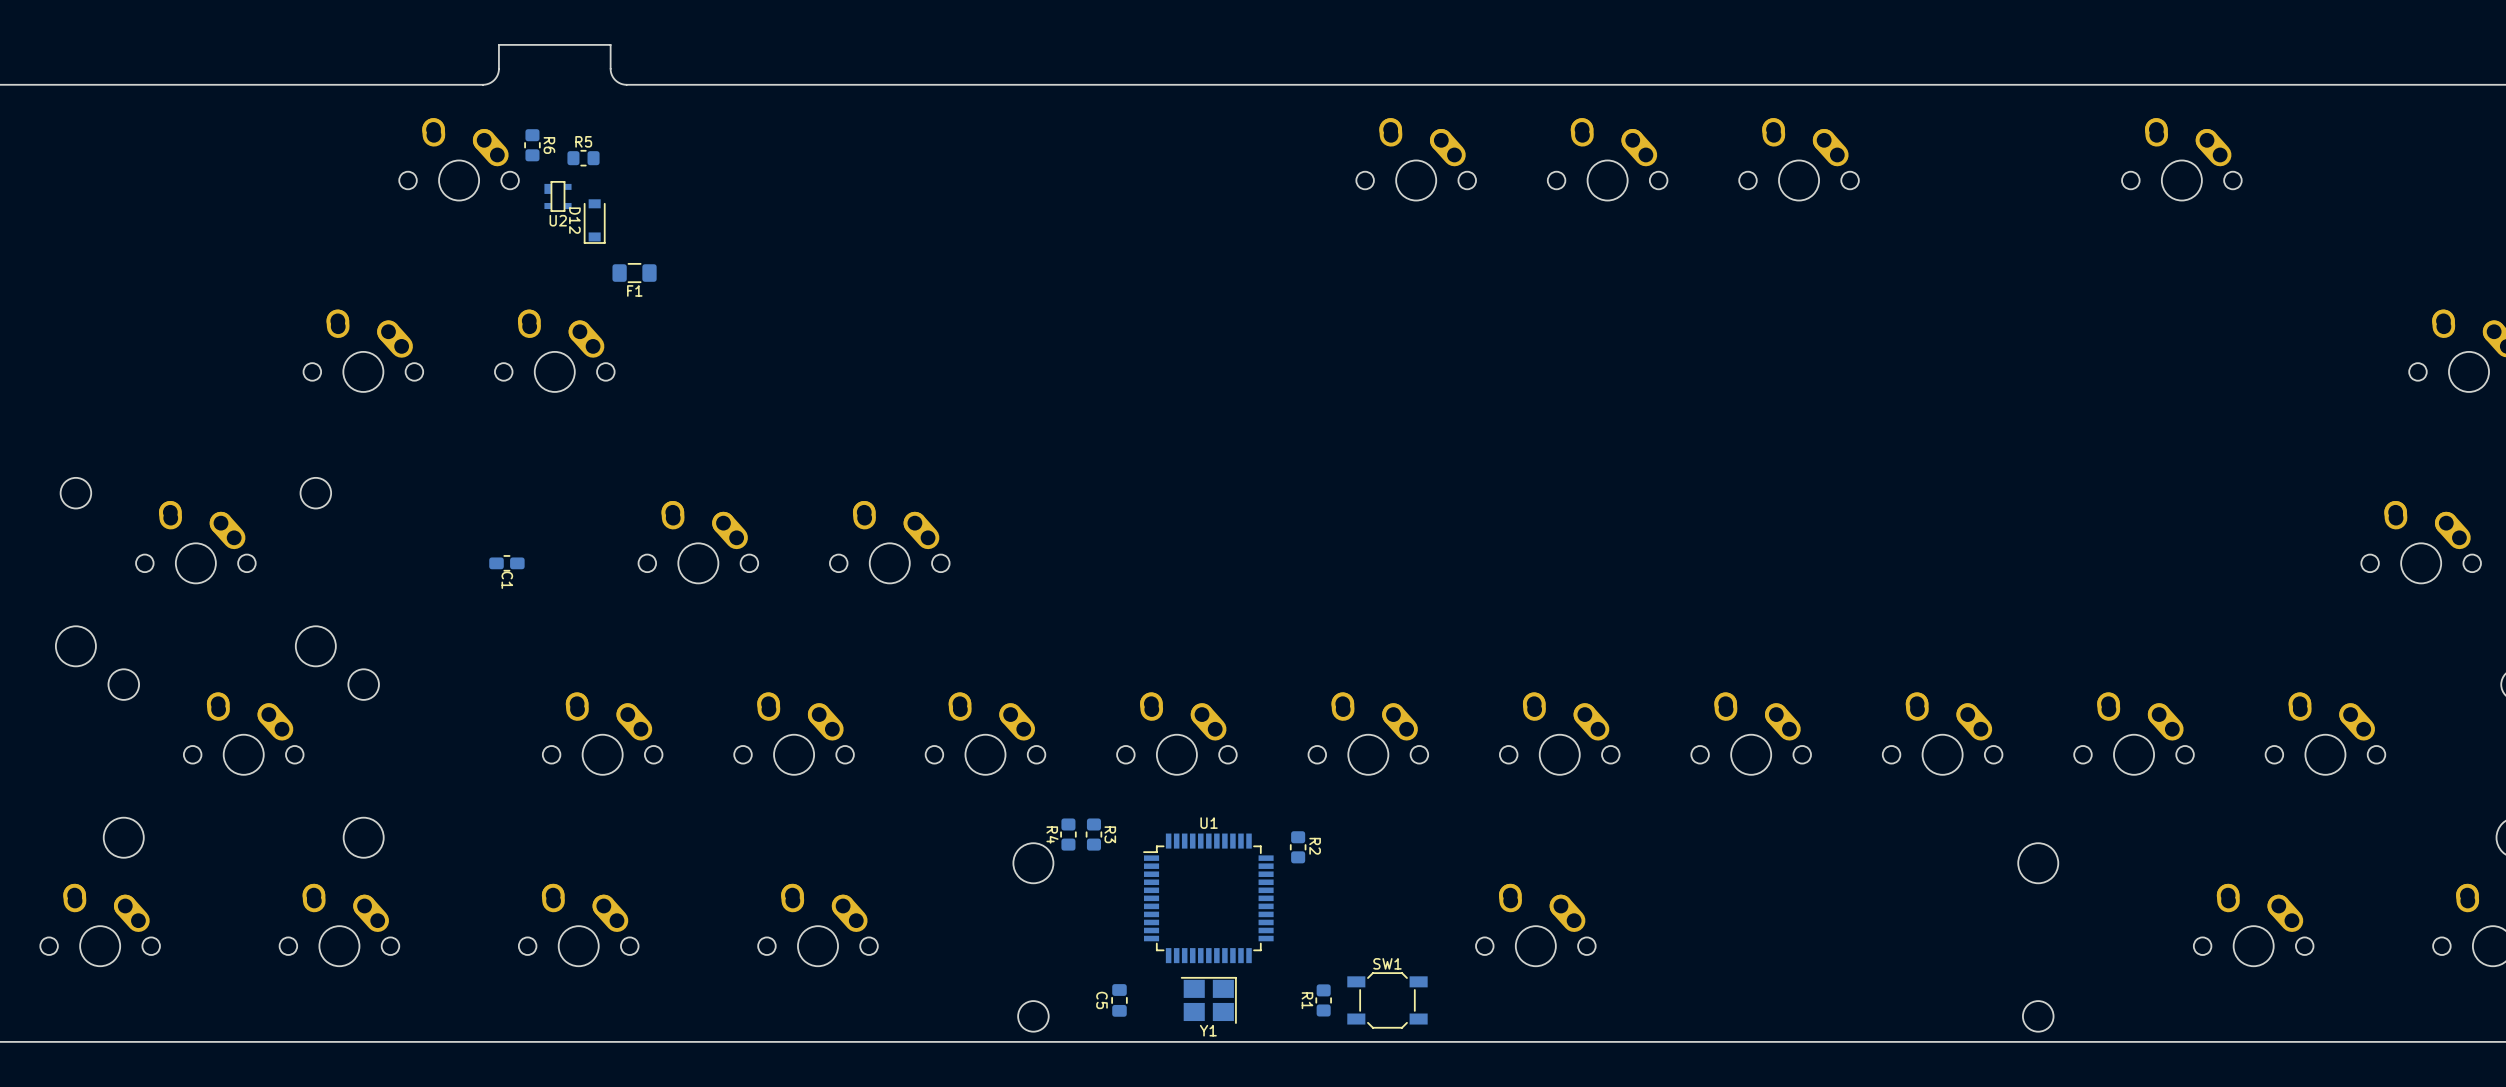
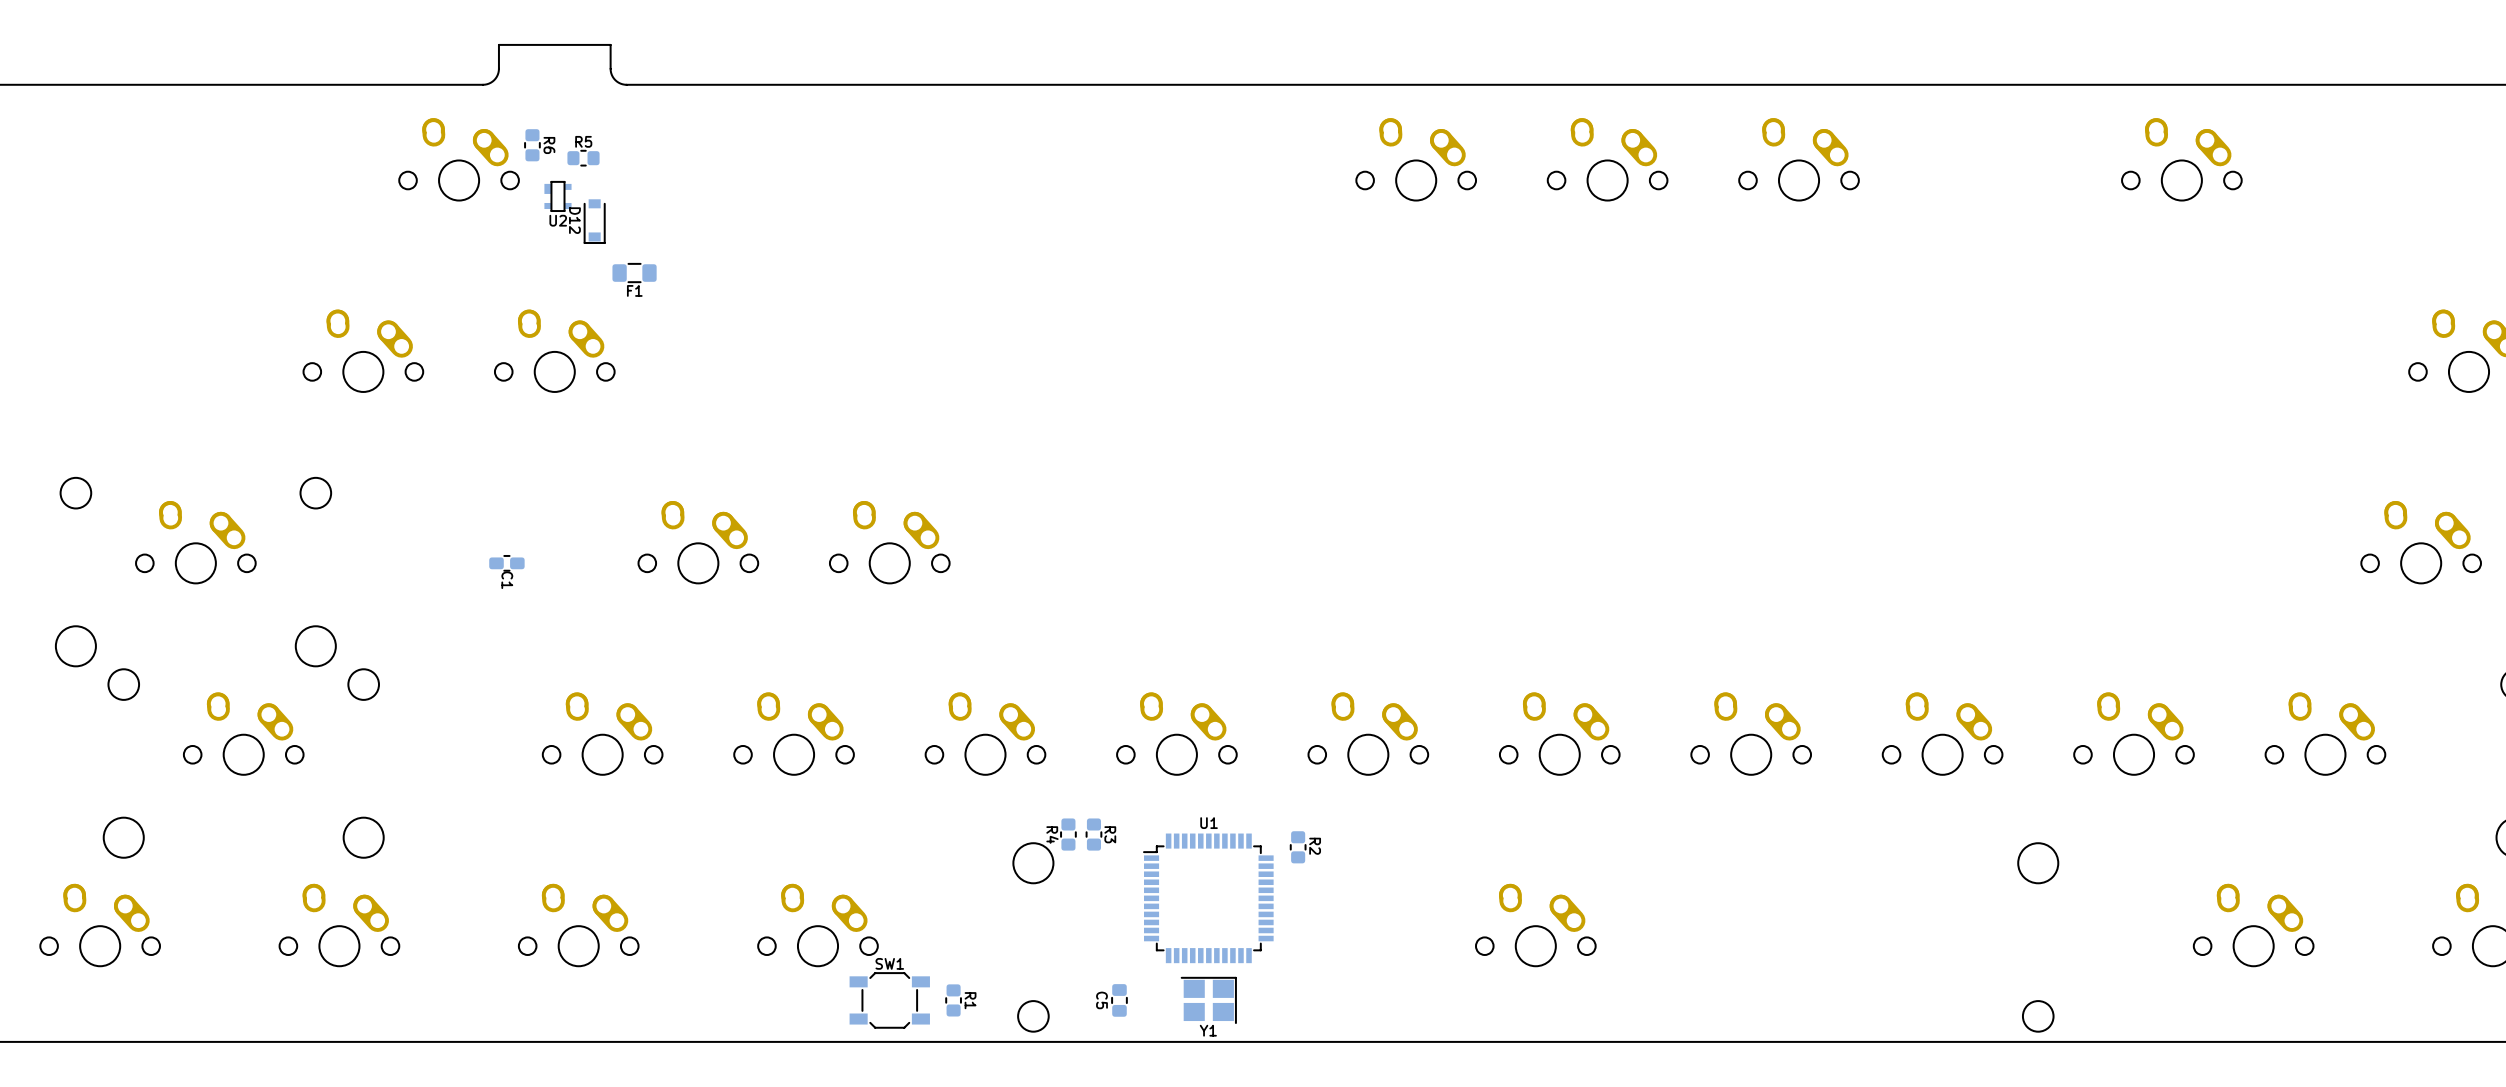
R1 name position: R1 (1307, 1000) -> R1 (970, 1000)
R1 position: (1323, 1000) -> (953, 1000)
SW1 position: (1387, 1000) -> (889, 1000)

